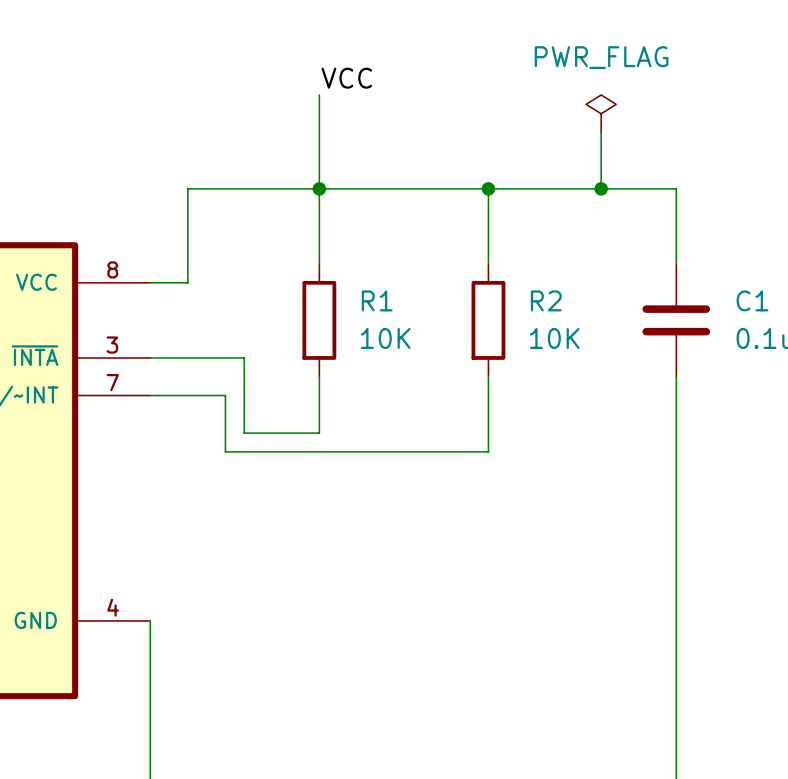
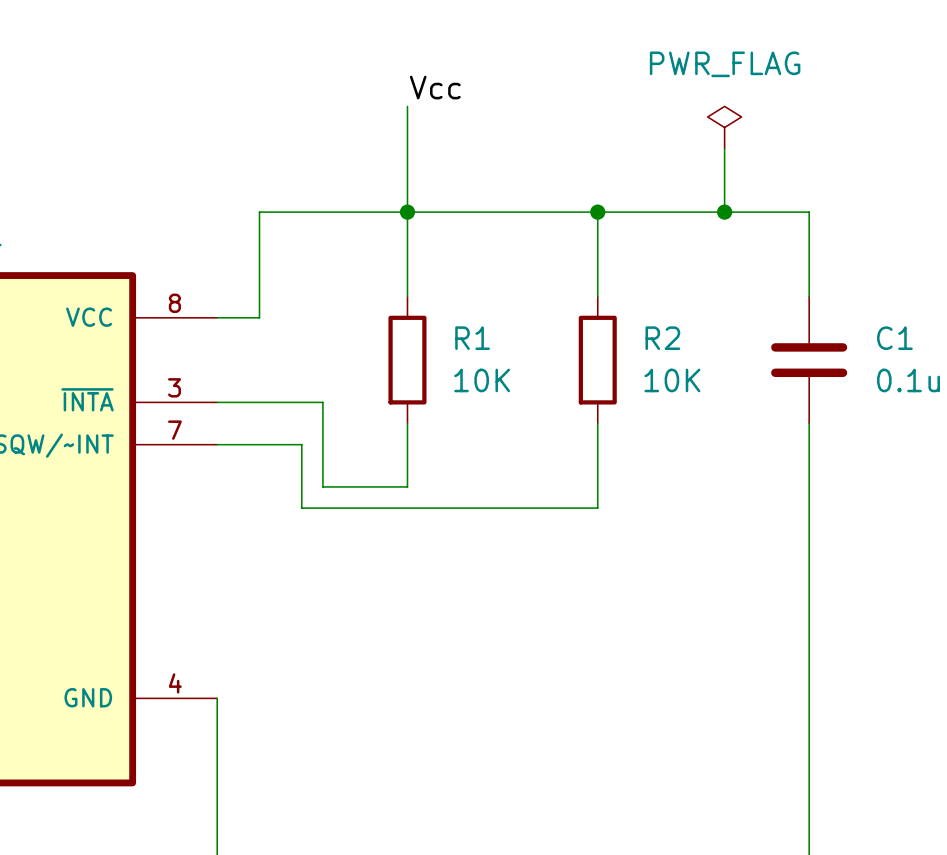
label: VCC (346, 78) -> Vcc (435, 87)

